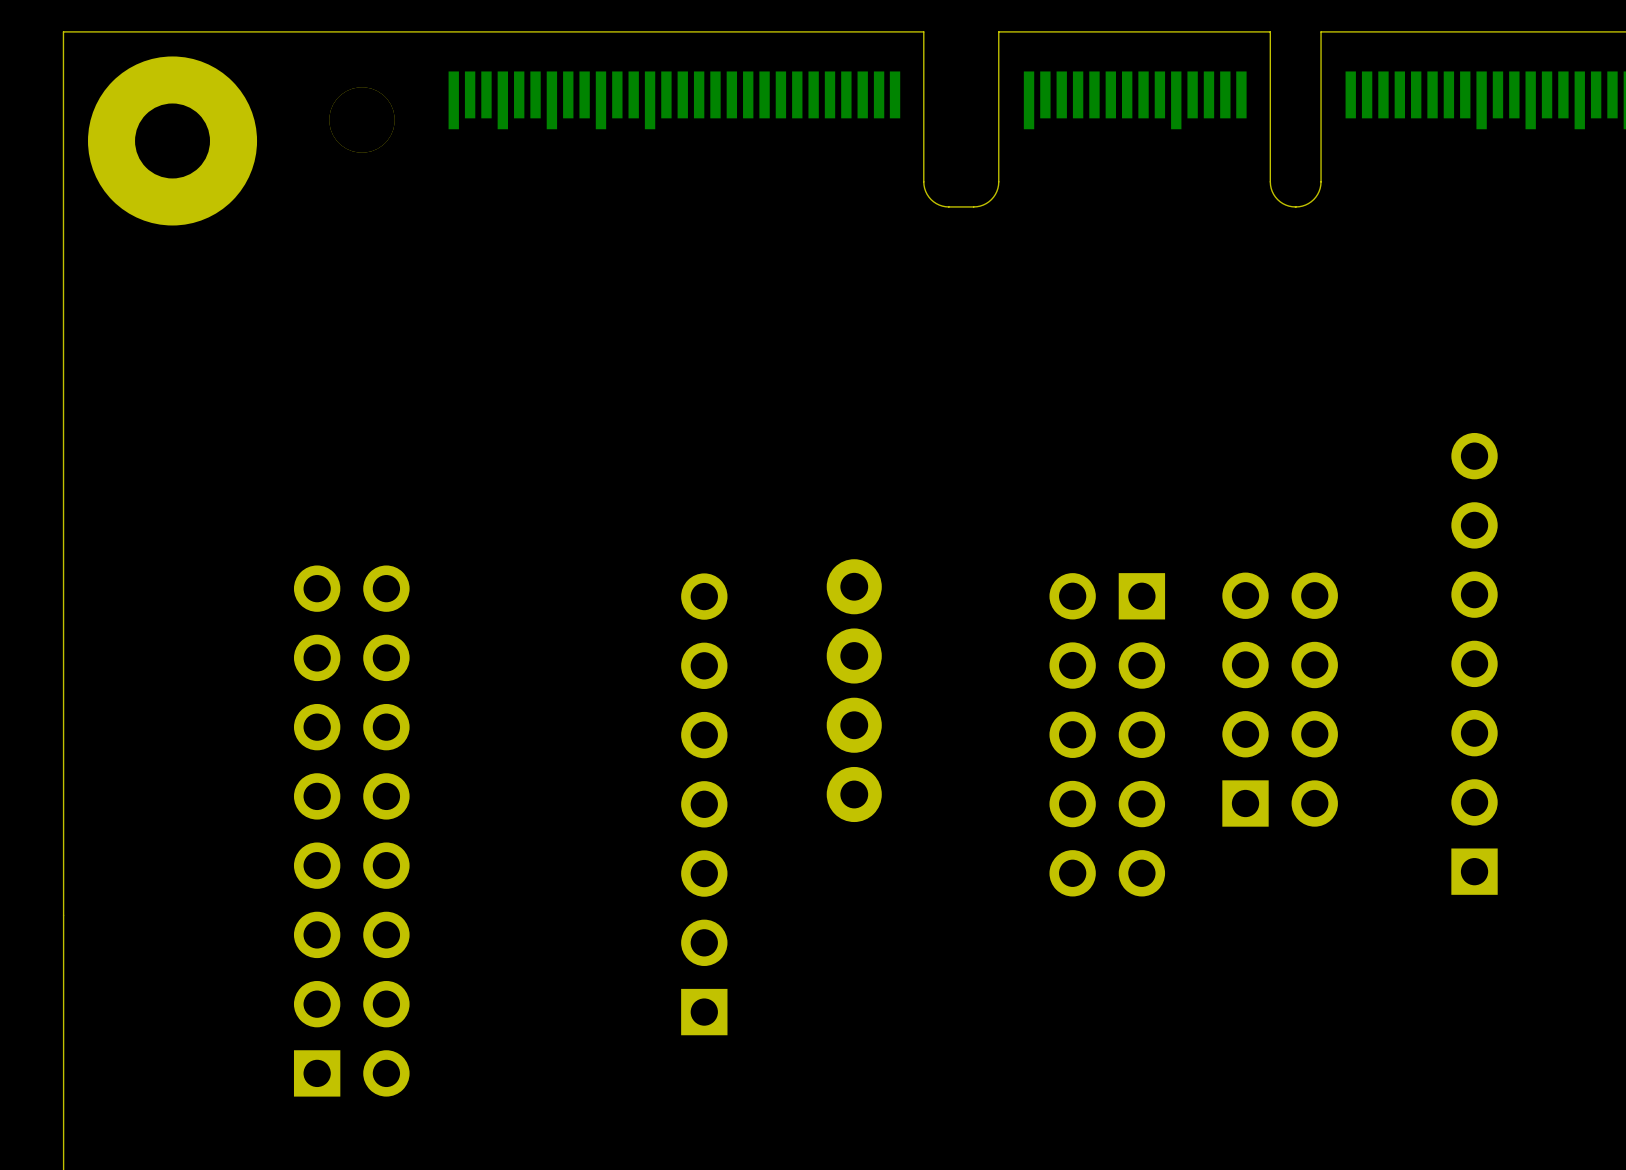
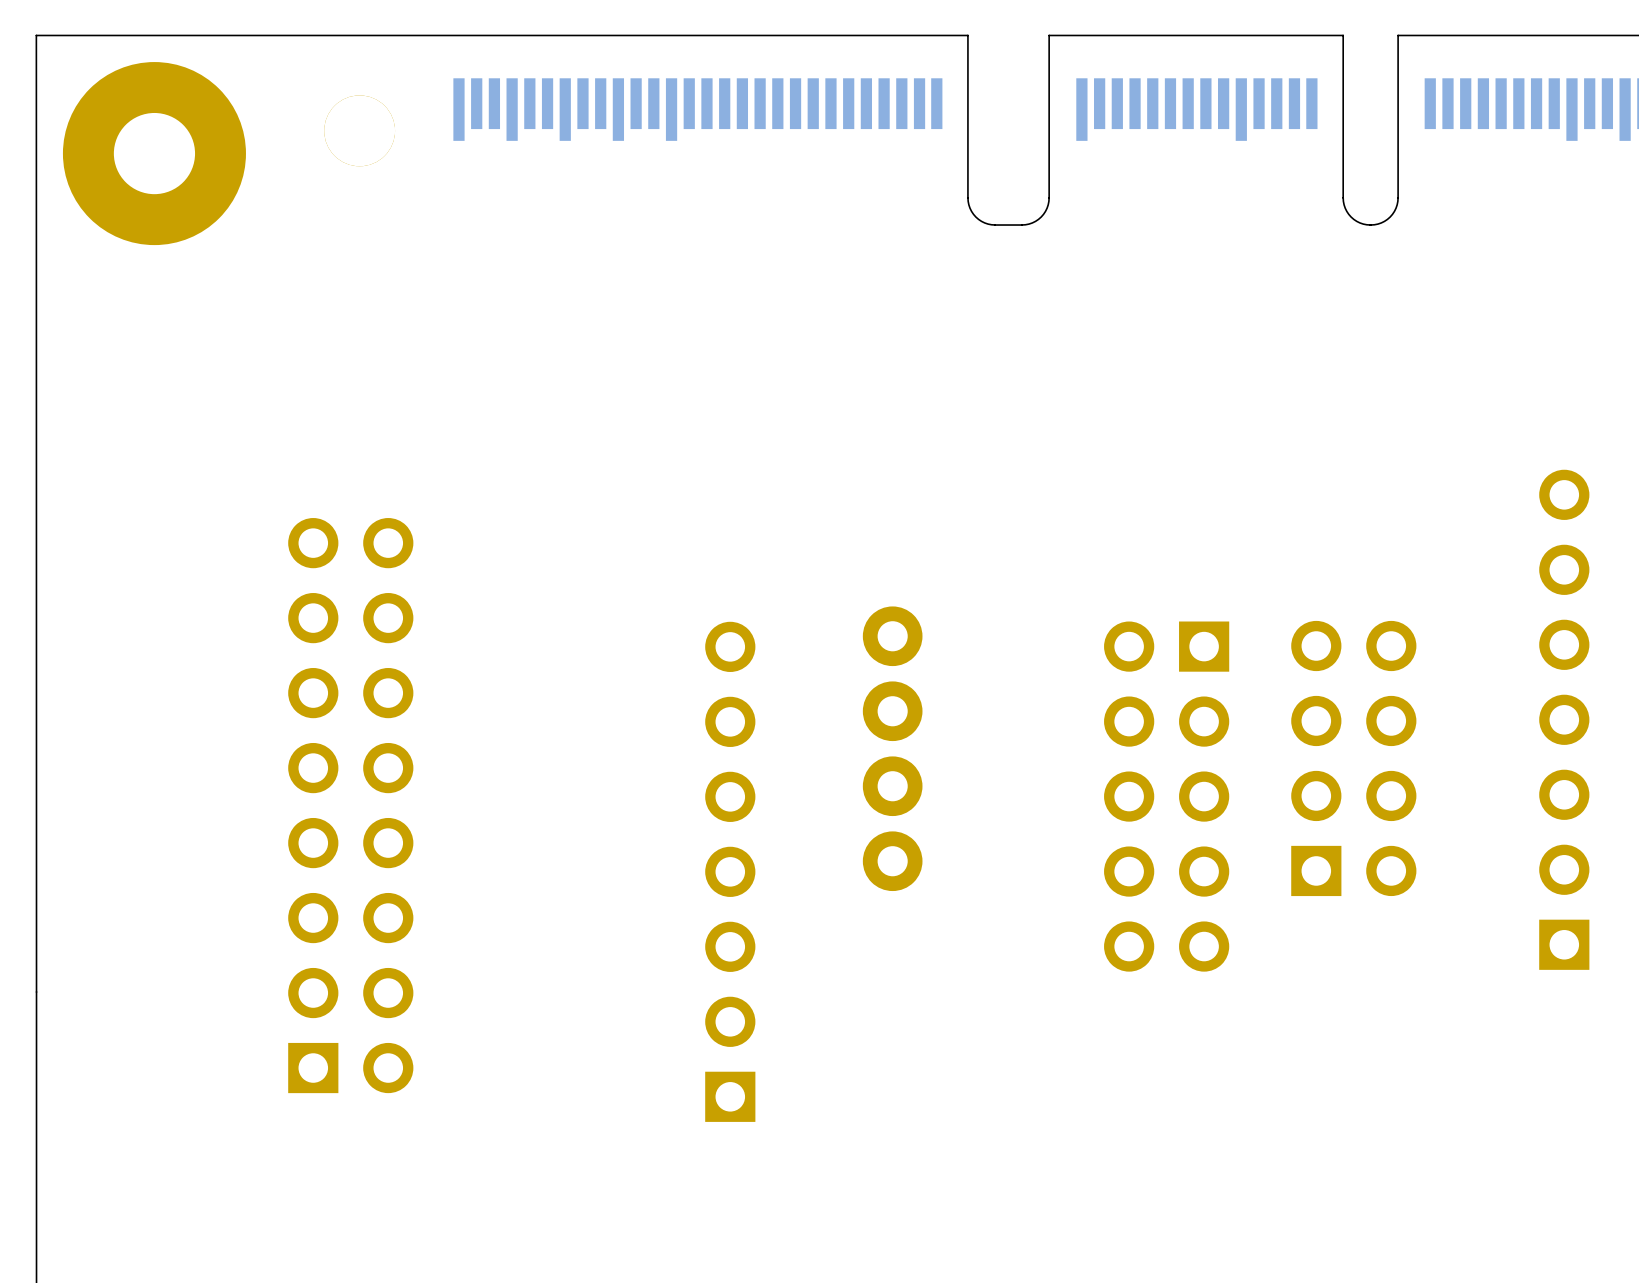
part position: (351, 831) -> (350, 805)

